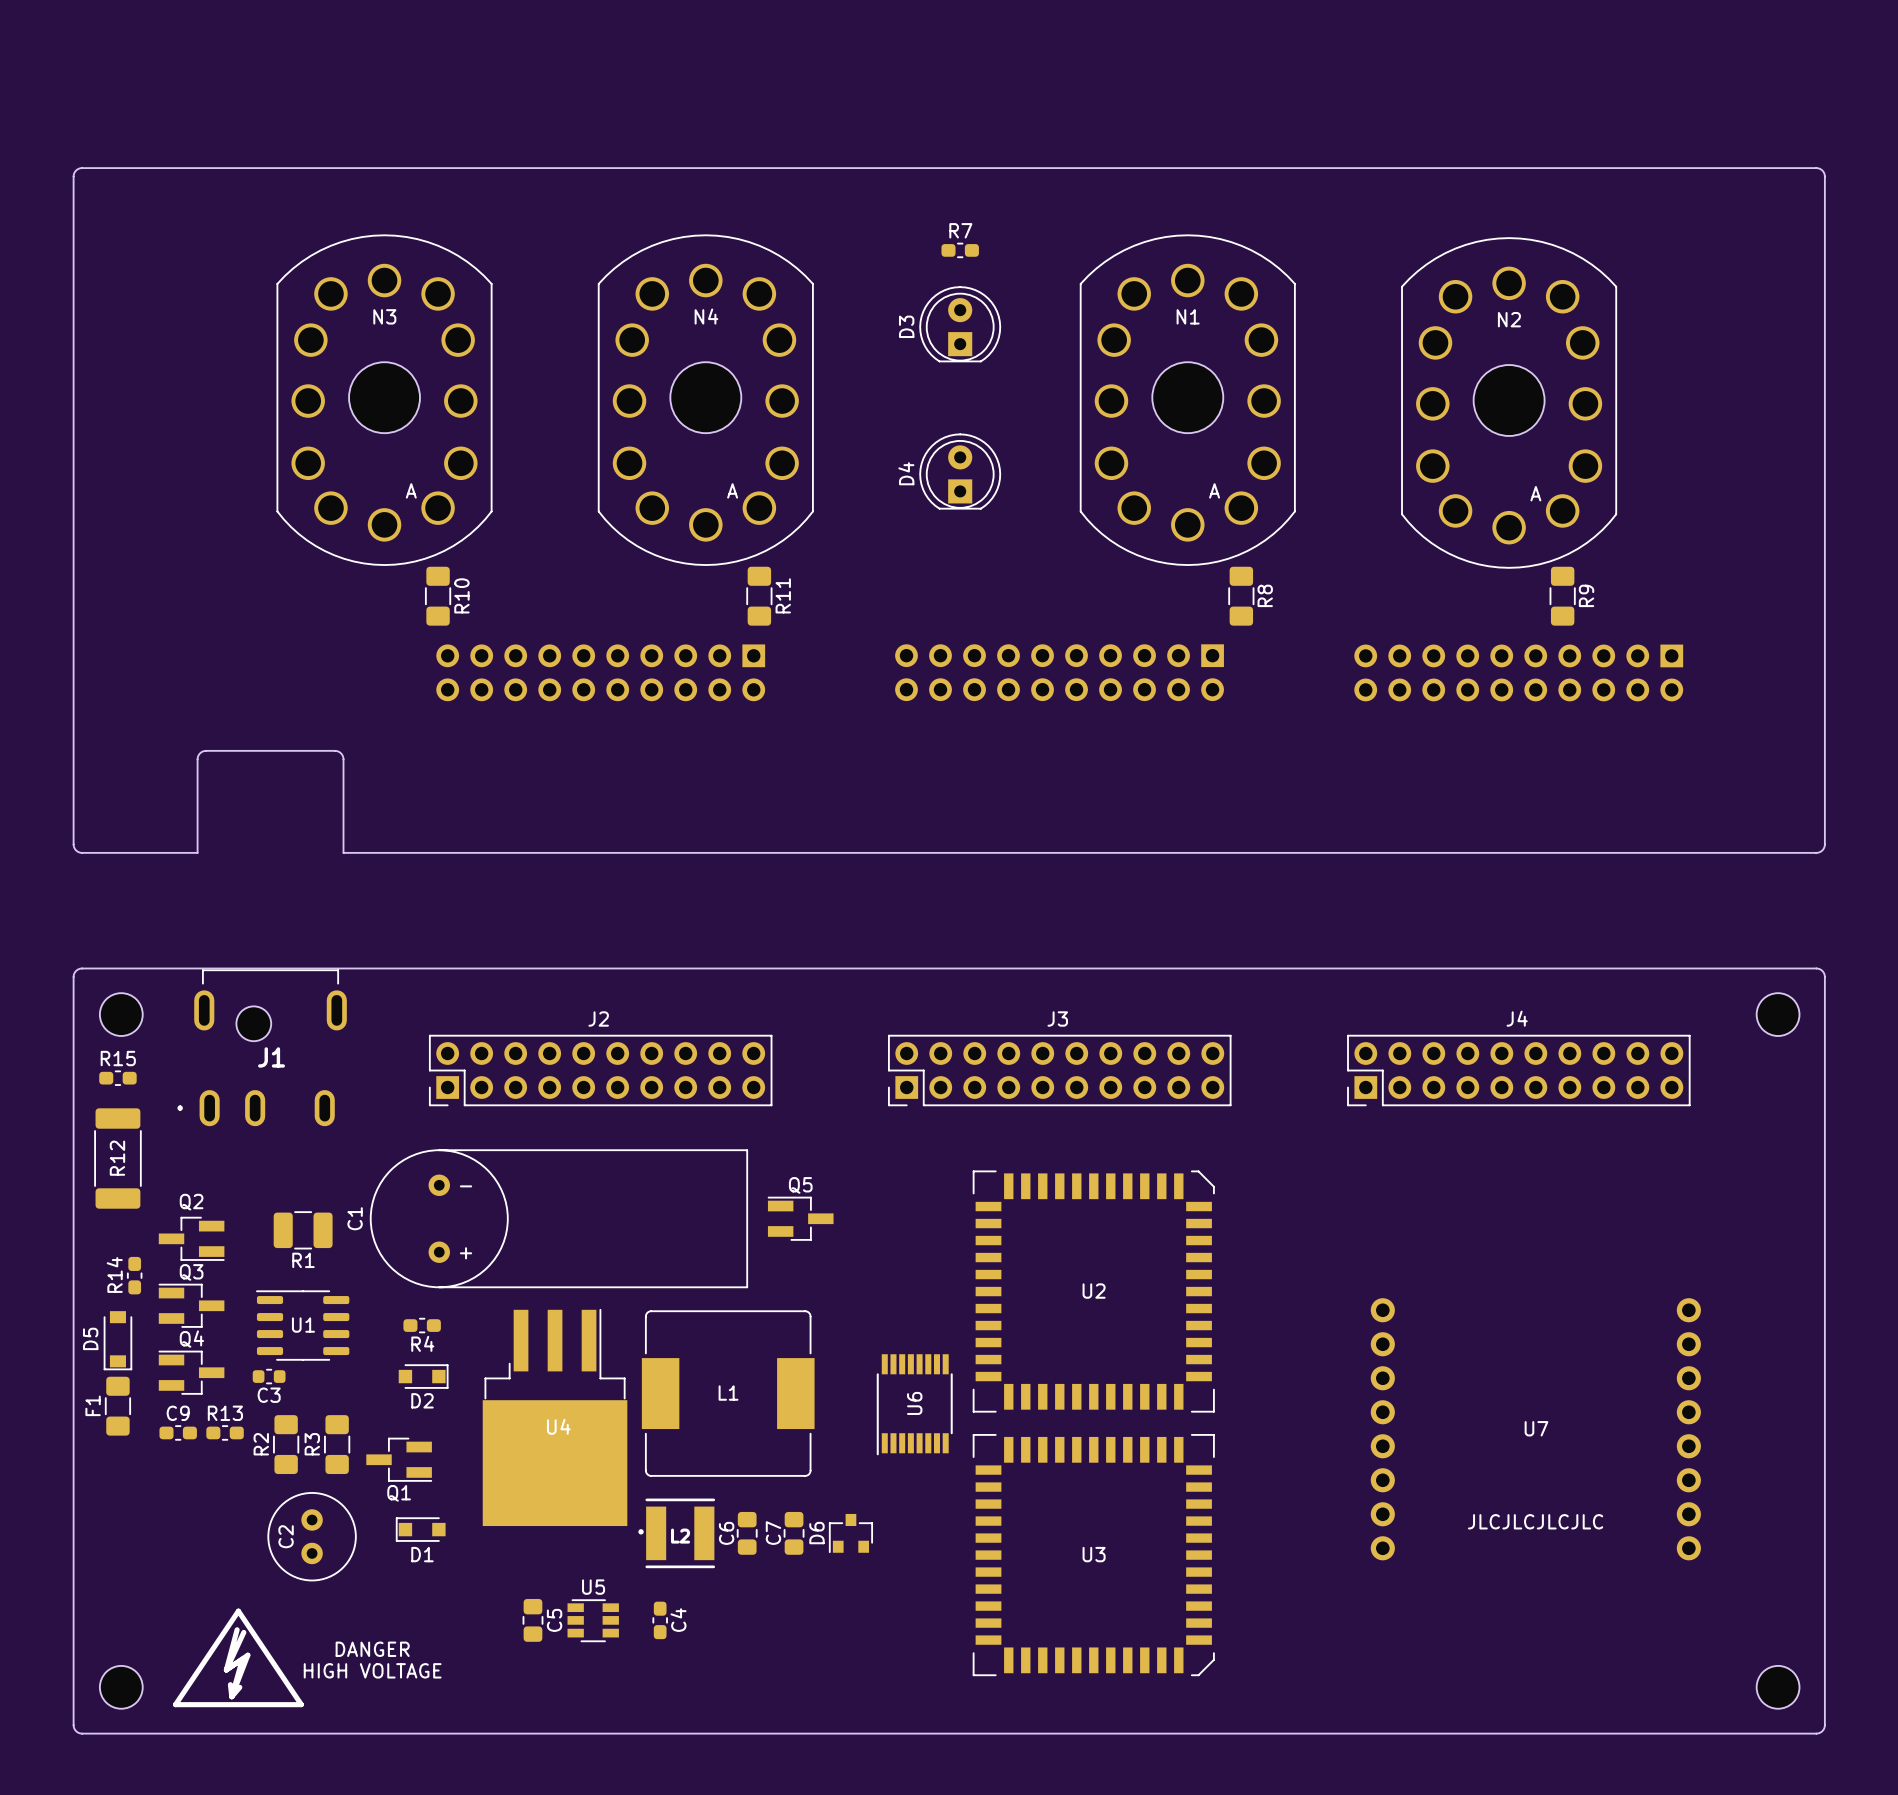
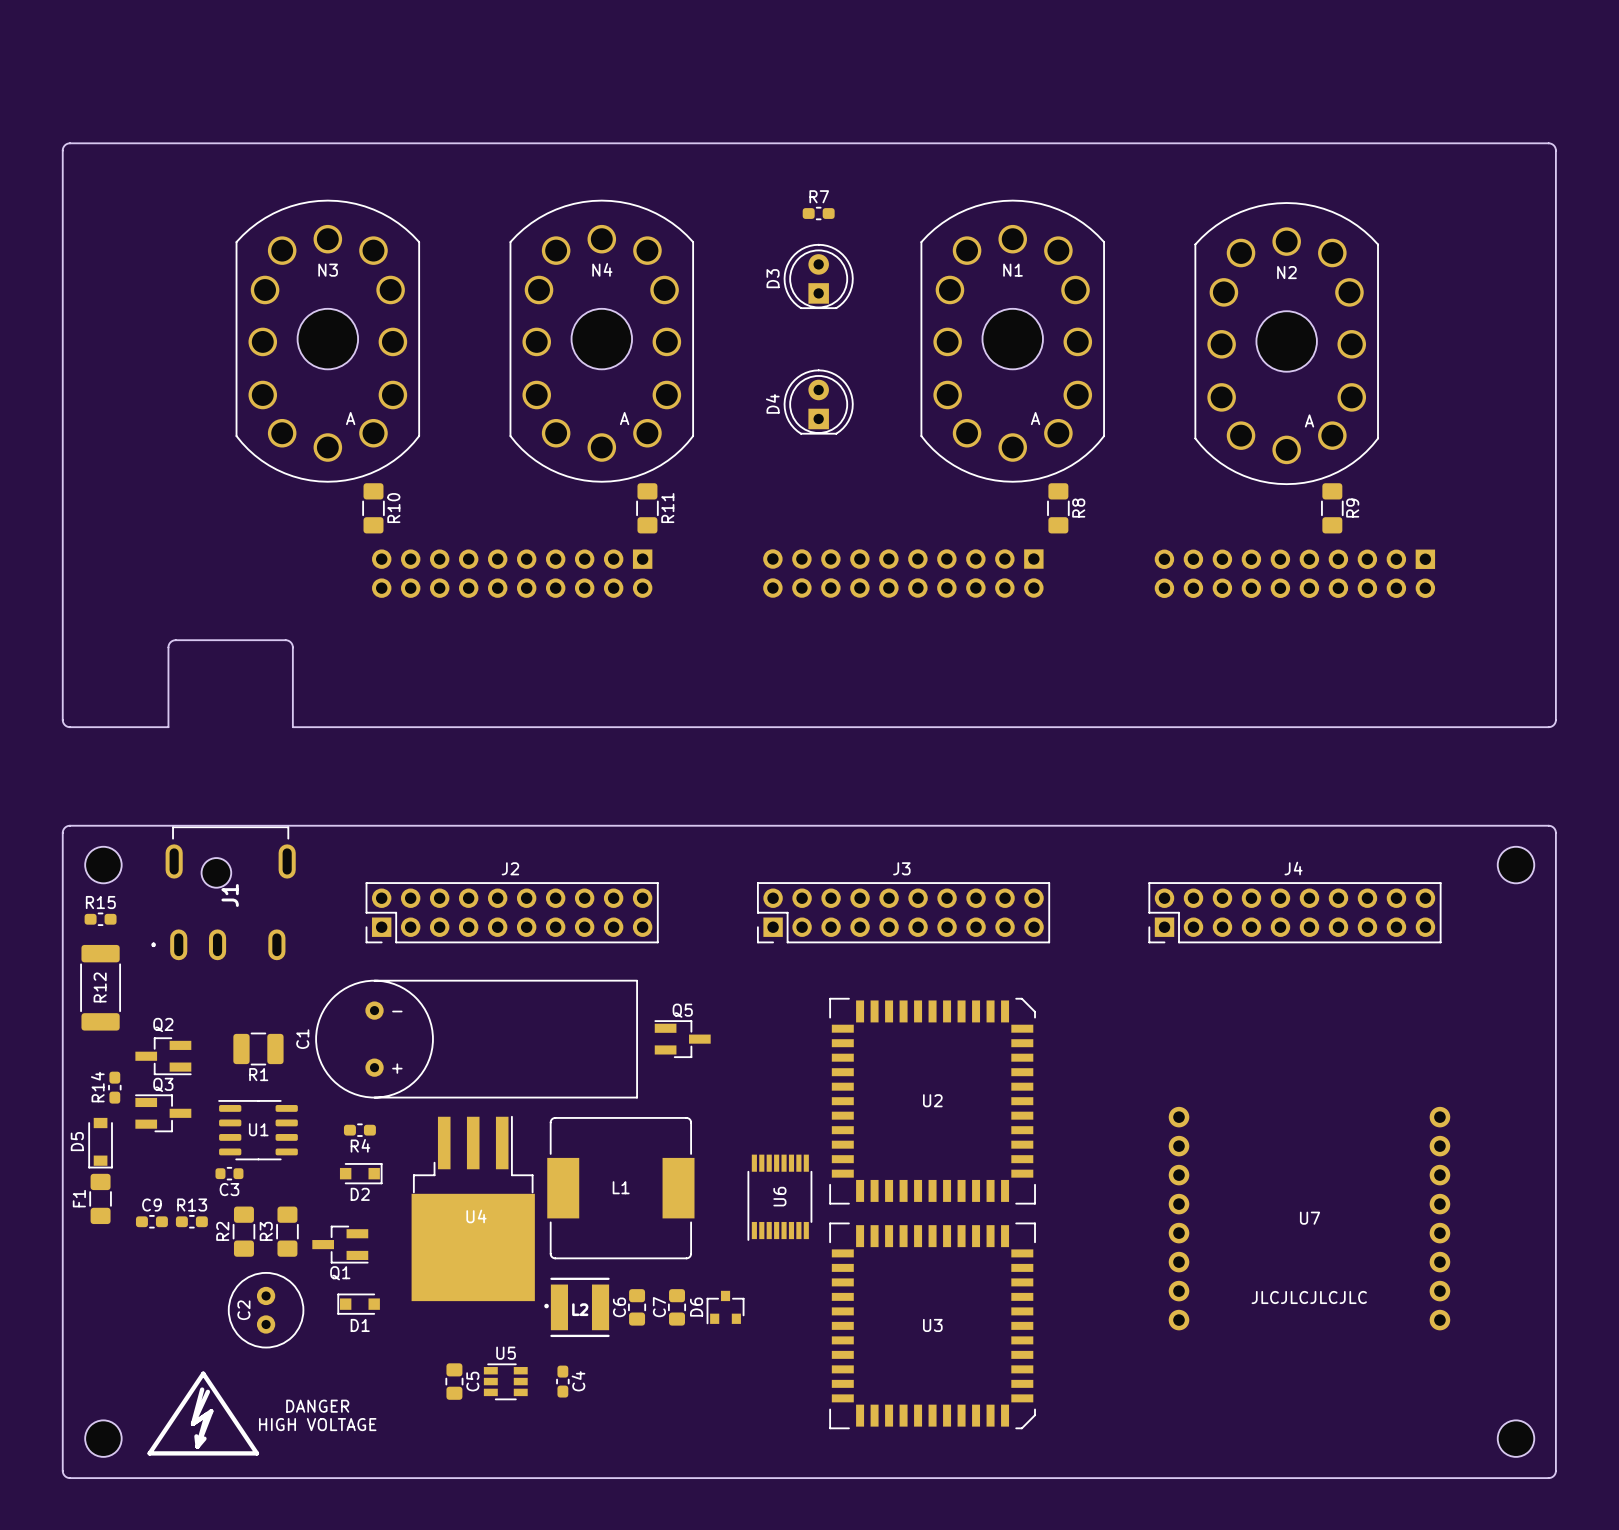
J1 name rotation: 0° (271, 1057) -> 90° counterclockwise (230, 895)
Q4: (191, 1372) -> none

